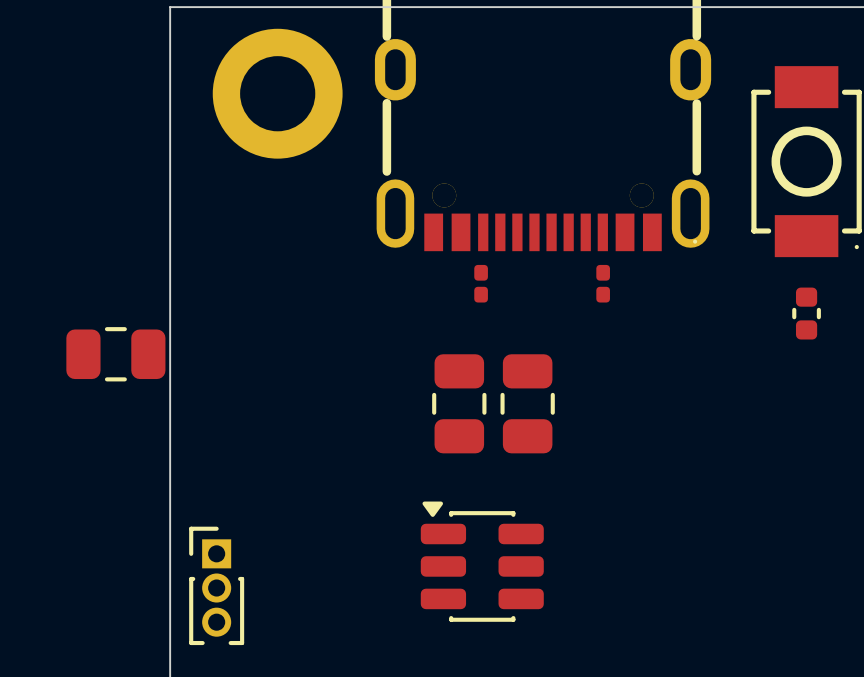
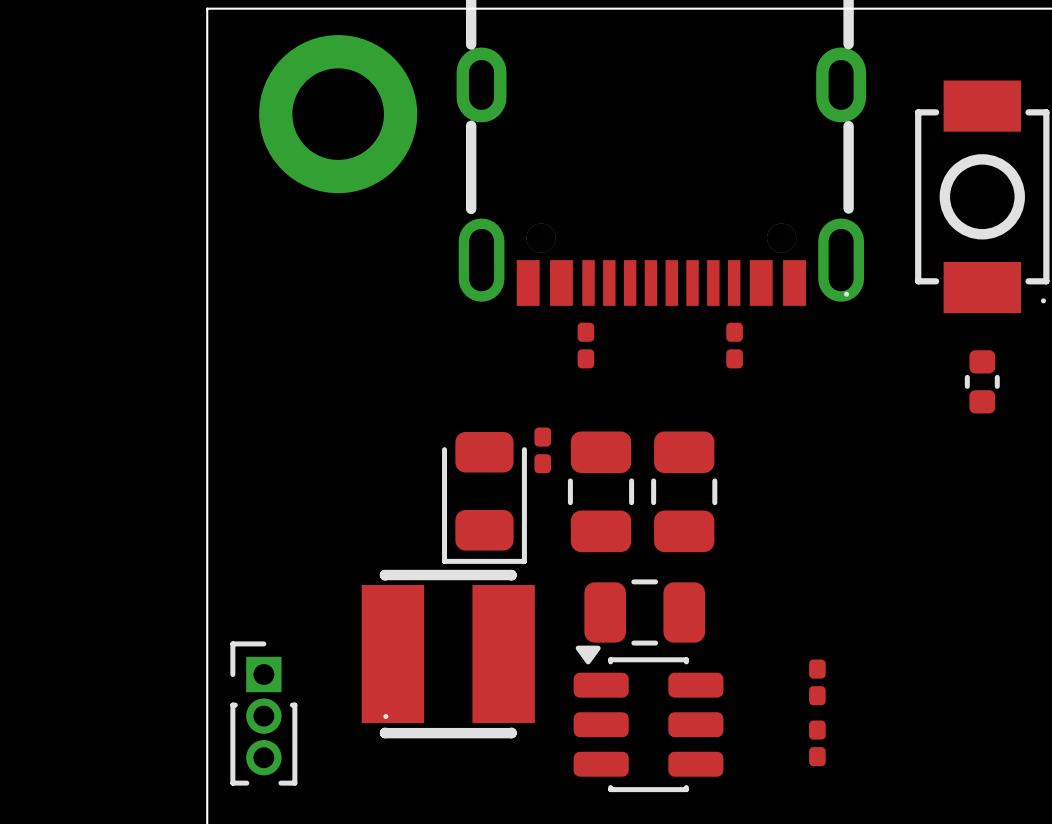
part: (115, 354) -> none
part: none -> (542, 450)
part: (459, 403) -> none
part: none -> (601, 491)
part: (527, 403) -> none
part: none -> (684, 491)
part: none -> (484, 497)
part: none -> (644, 612)
part: none -> (448, 654)
part: none -> (817, 682)
part position: (482, 561) -> (648, 718)
part: none -> (817, 743)

